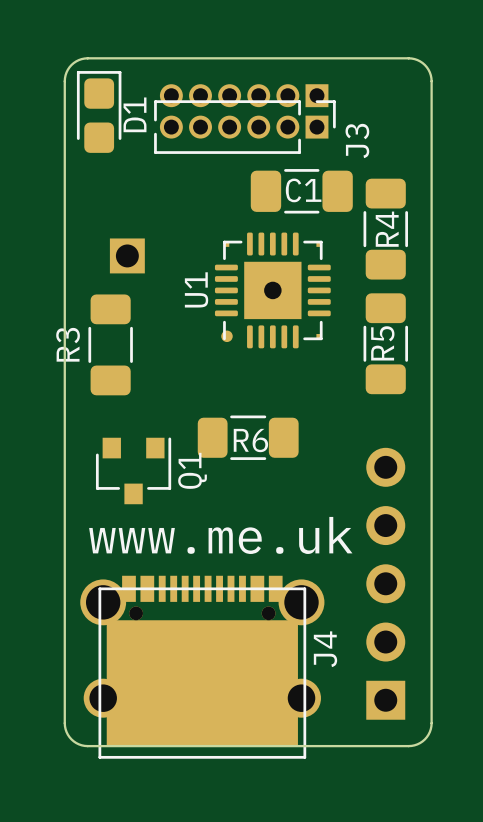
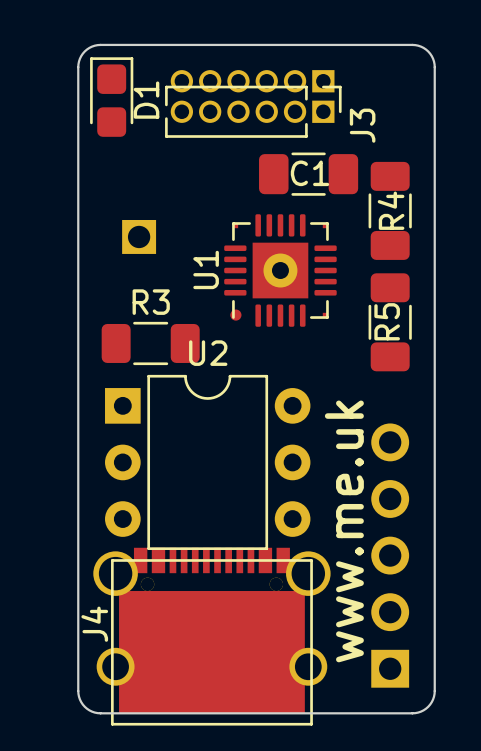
R3 rotation: 0° (110, 344) -> 90° clockwise (150, 343)
R6: (248, 437) -> none
Q1: (133, 470) -> none
U2: none -> (207, 462)
text rotation: 0° (220, 535) -> 90° counterclockwise (344, 531)
J4 name position: J4 (325, 649) -> J4 (94, 624)

